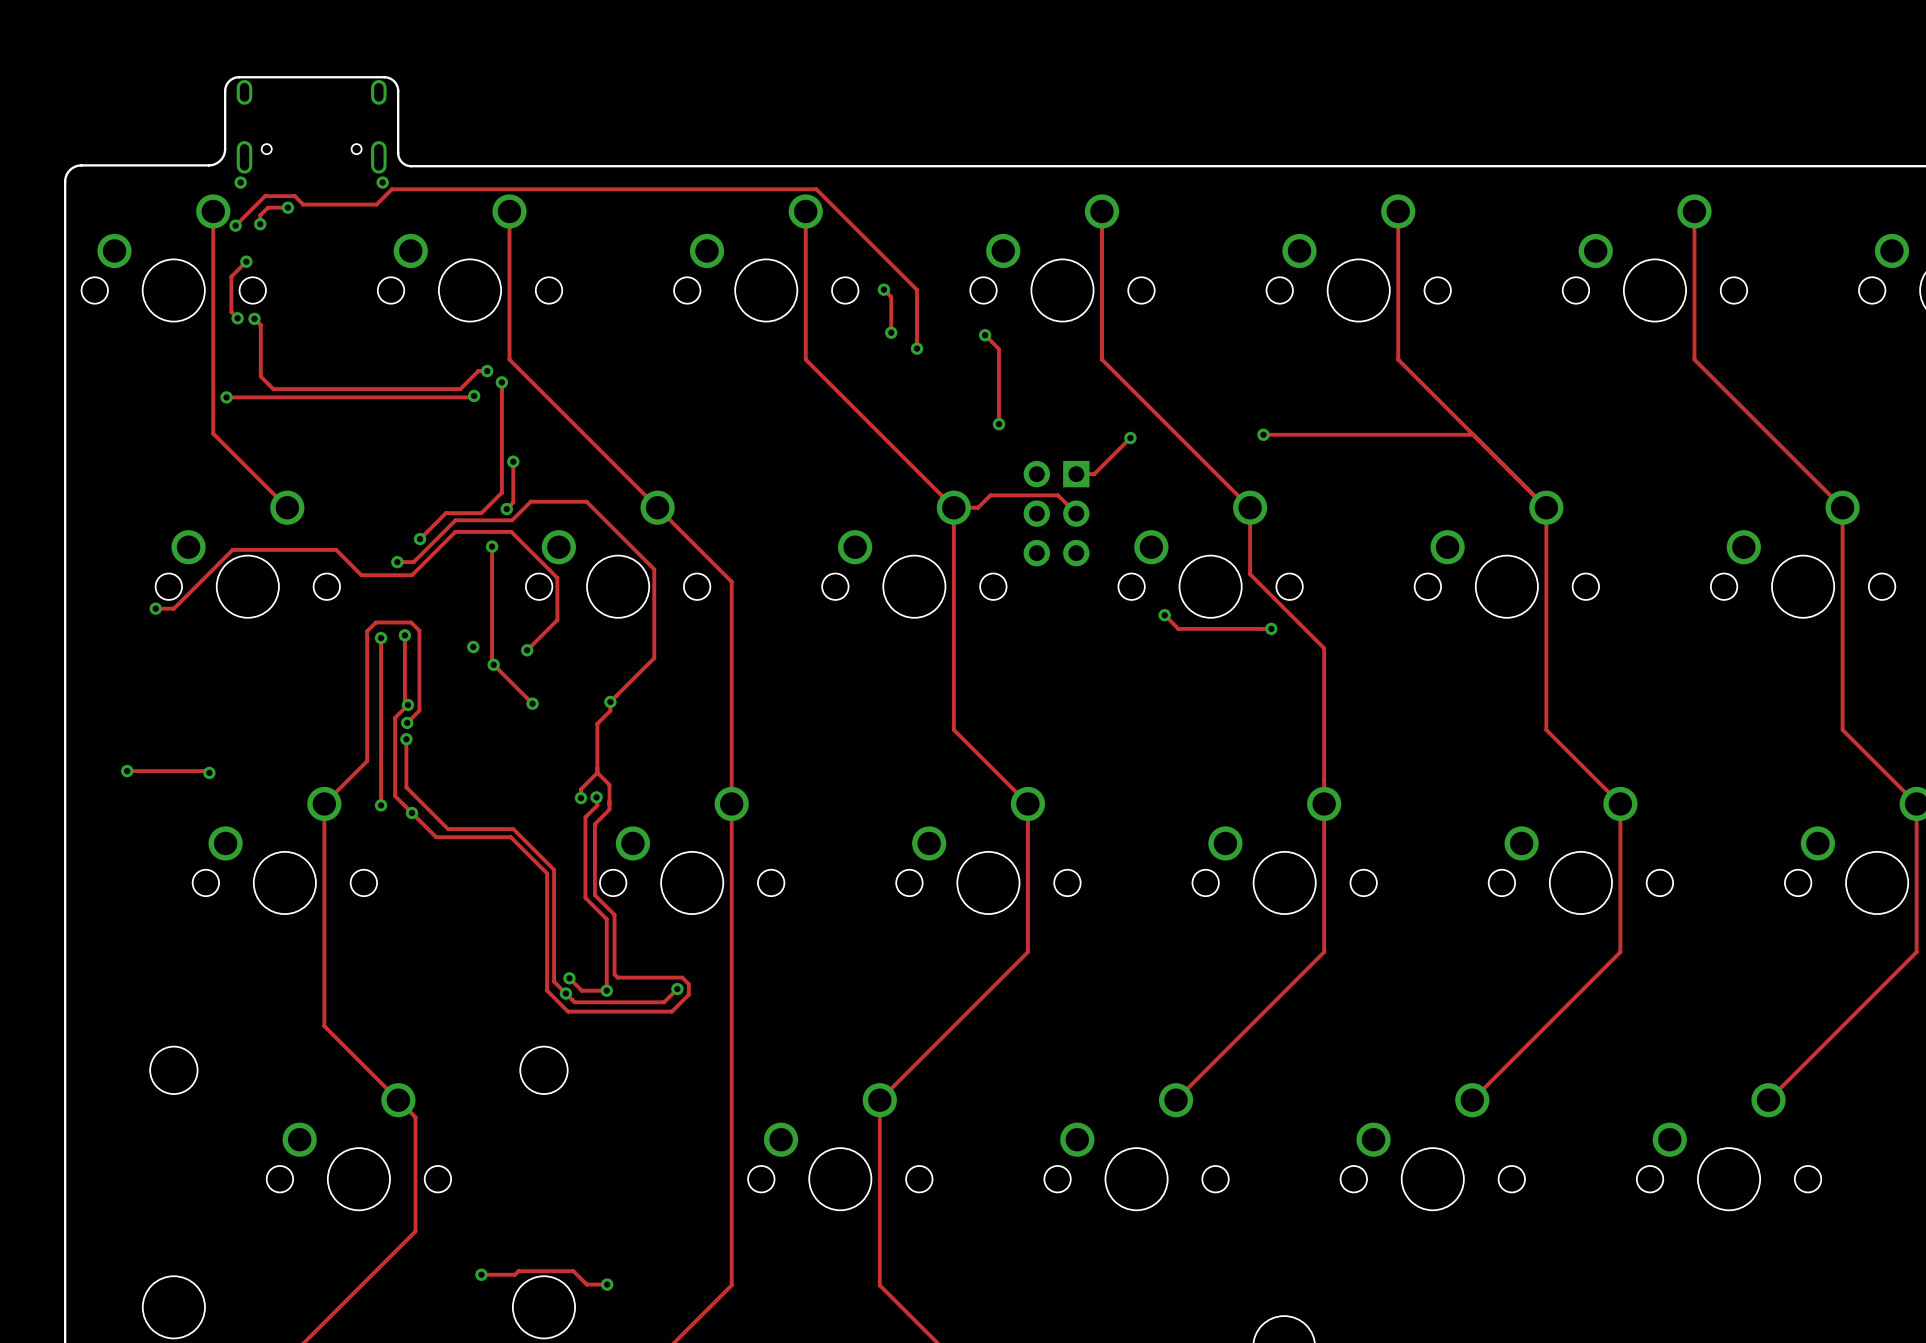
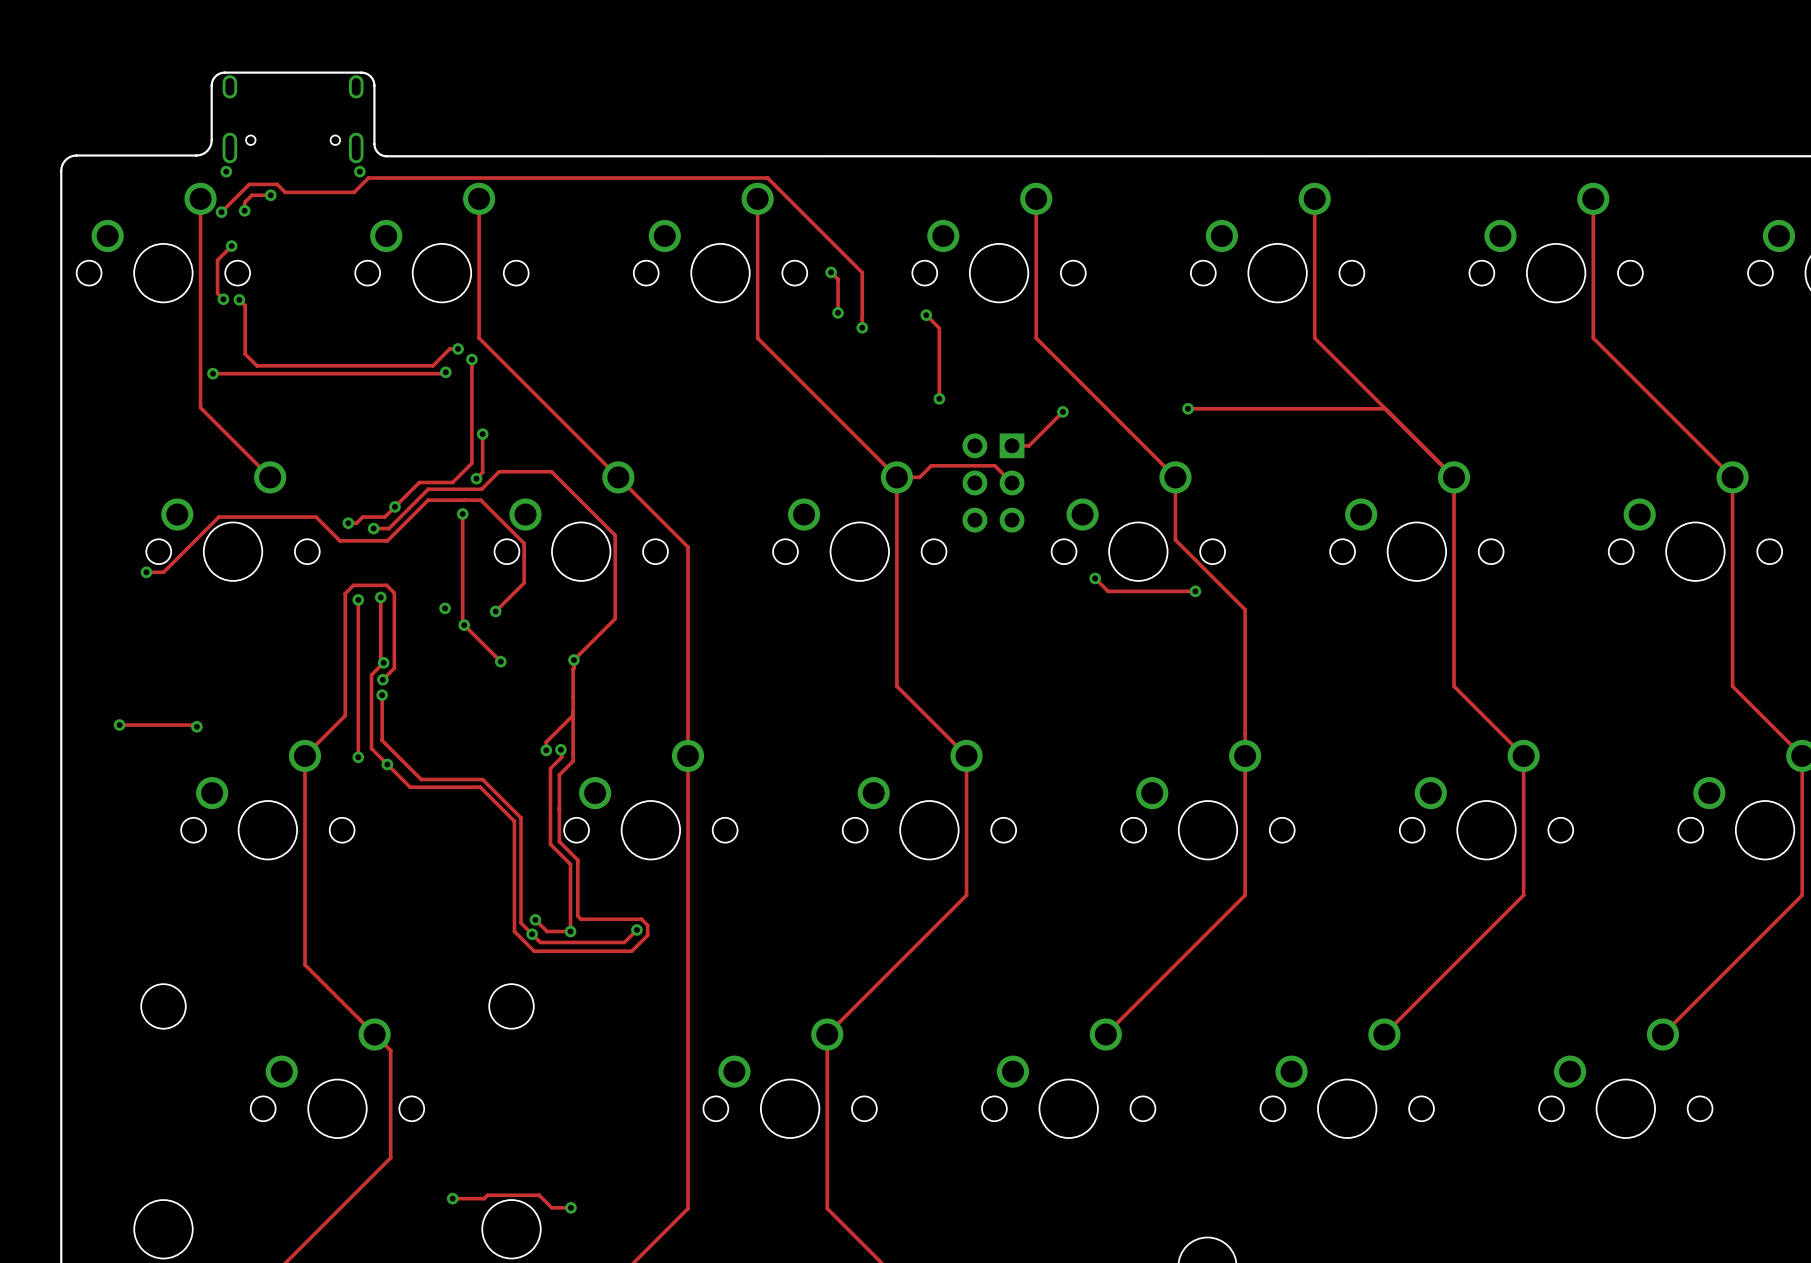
track: none -> (394, 506) (384, 517) (362, 517) (356, 523) (348, 523)
via: none -> (348, 523)
track: (609, 711) (597, 723) (597, 772) -> (573, 669) (573, 737)
track: (597, 772) (609, 784) -> (561, 726) (573, 715)

